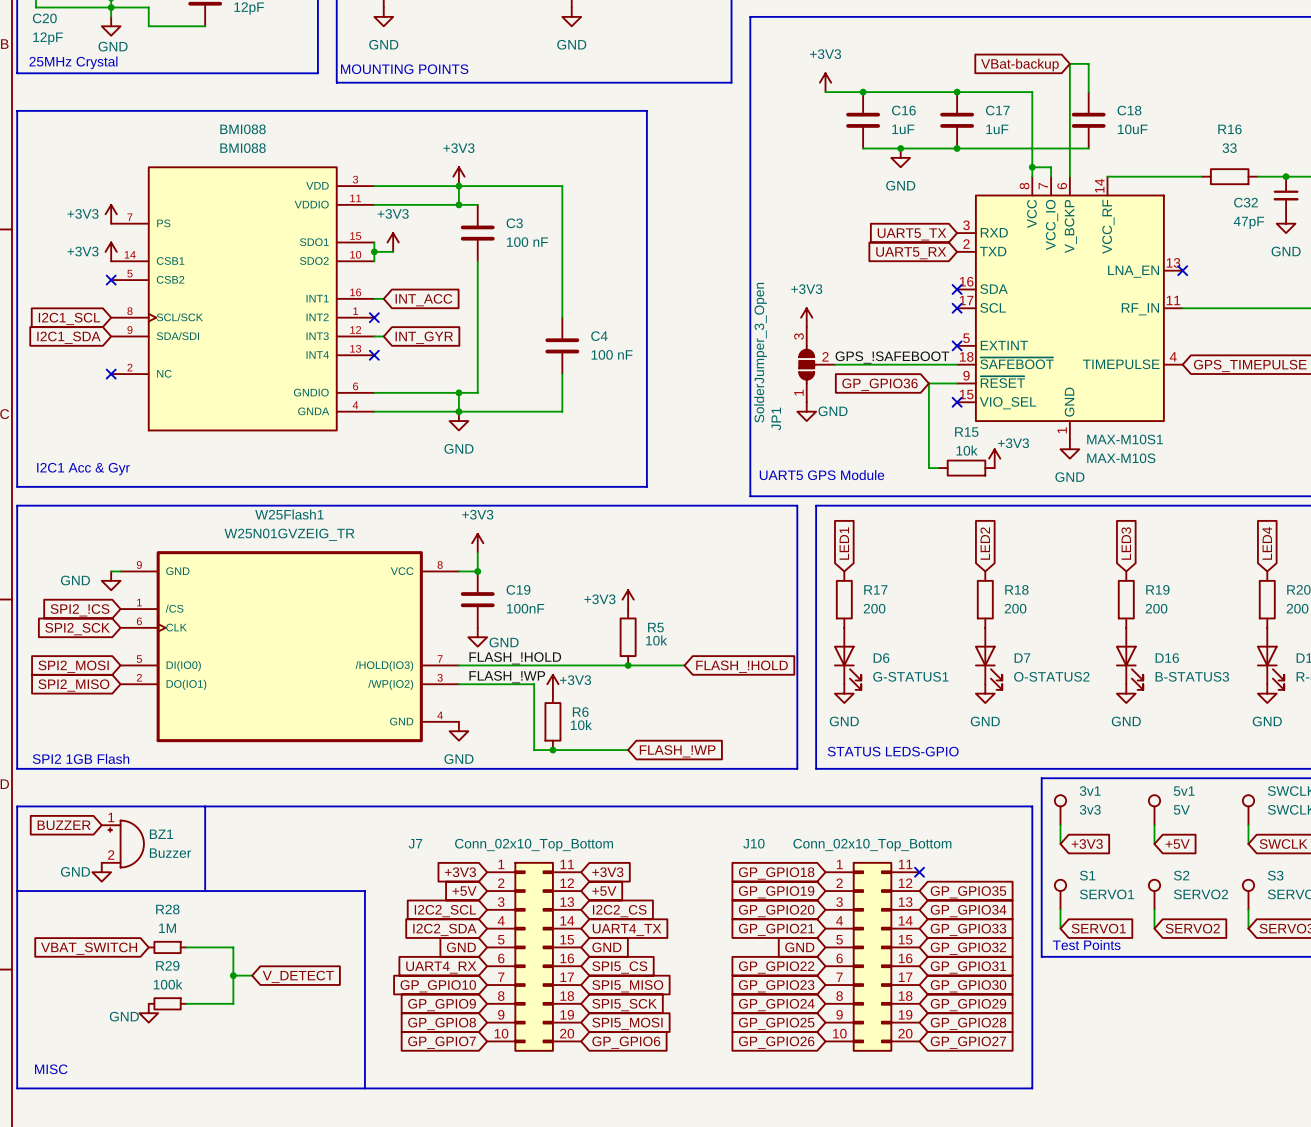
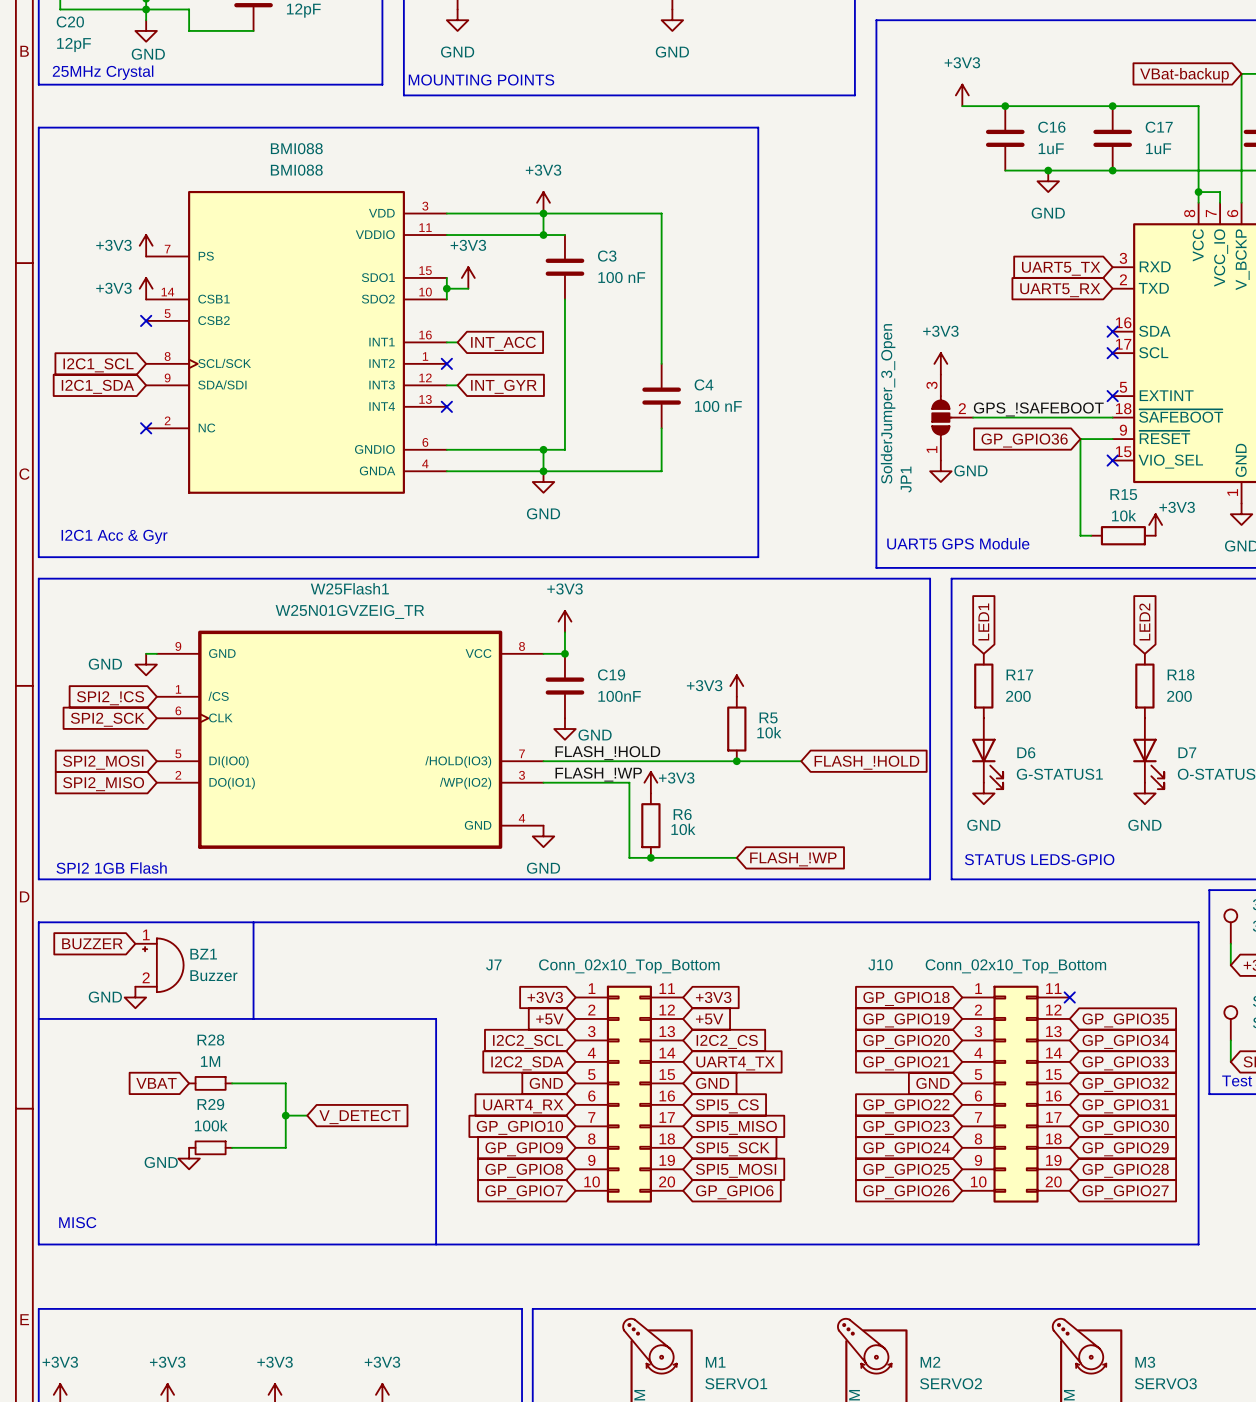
global label: VBAT_SWITCH (89, 948) -> VBAT (156, 1083)

